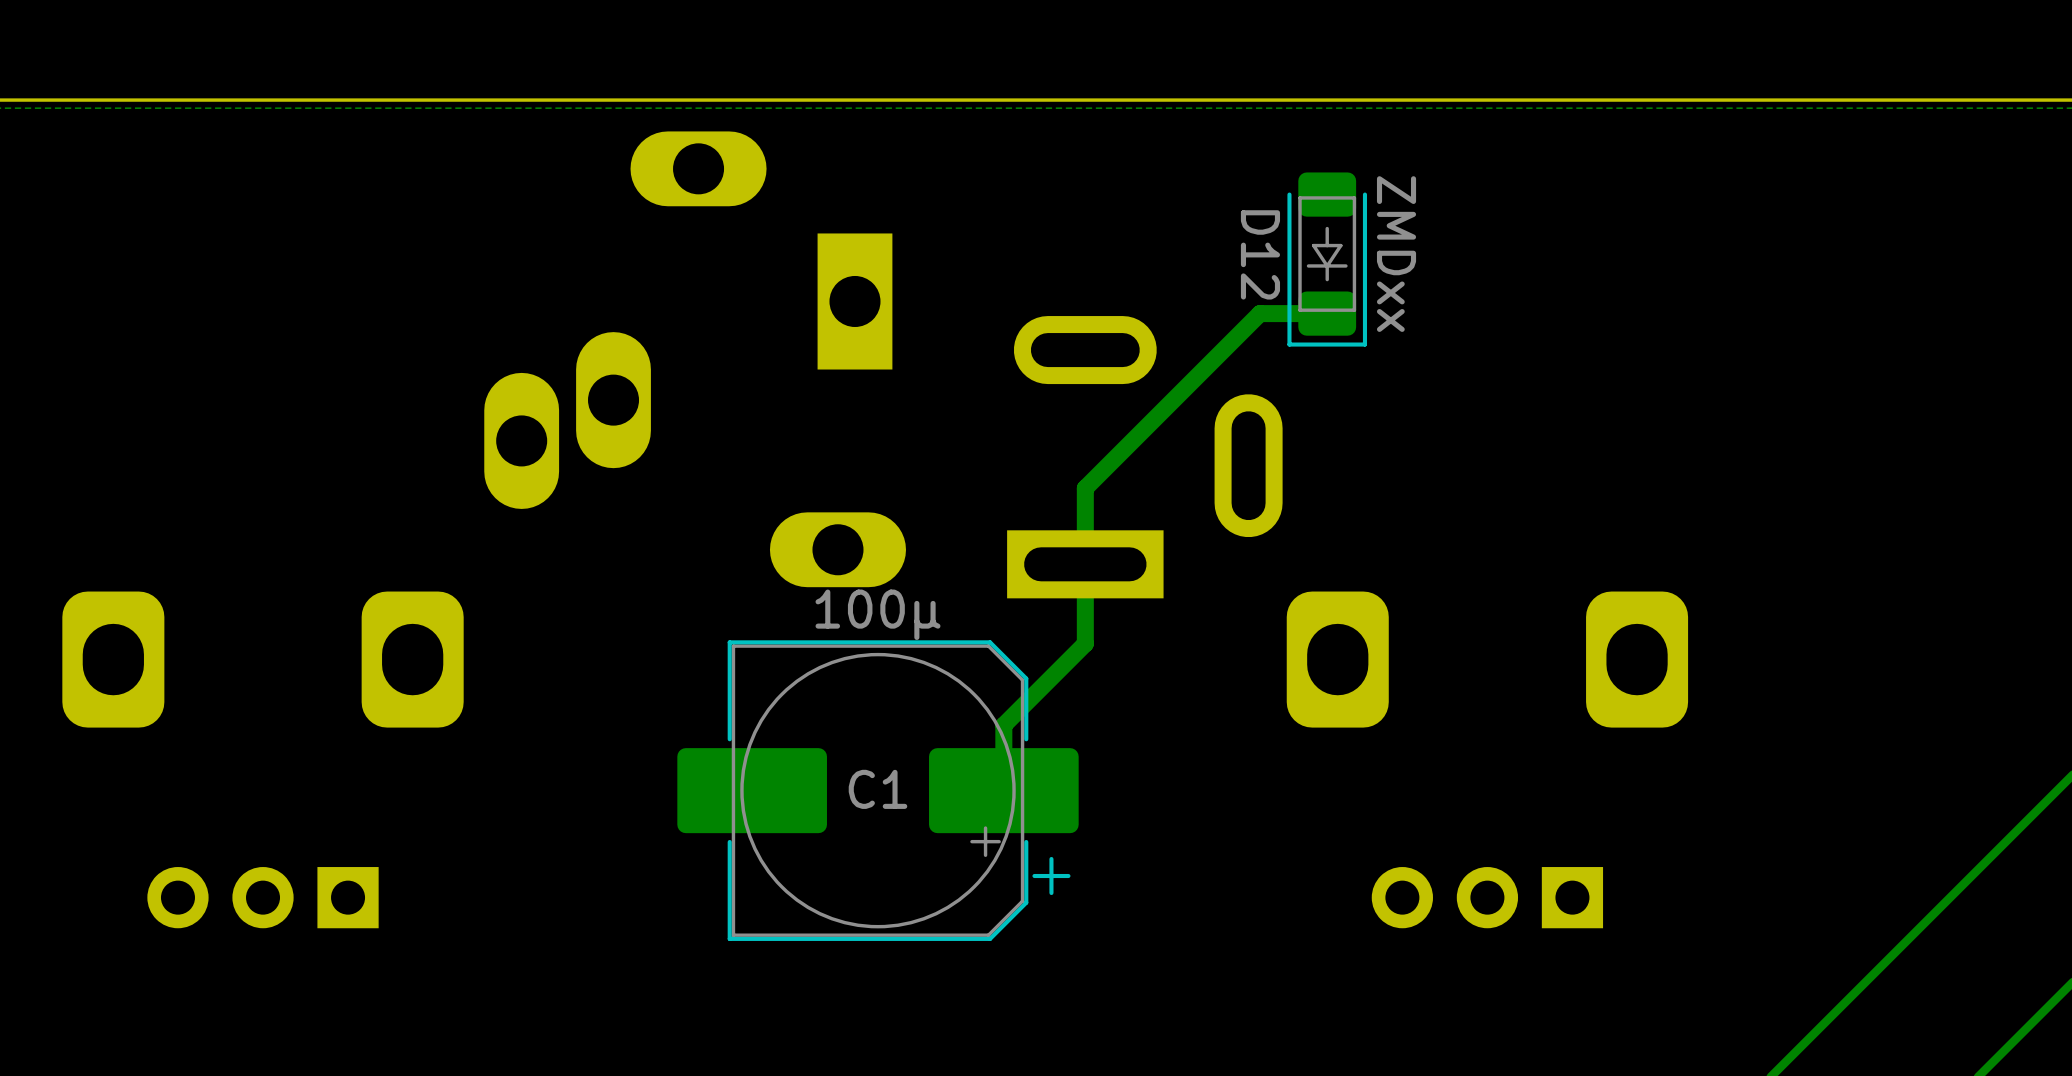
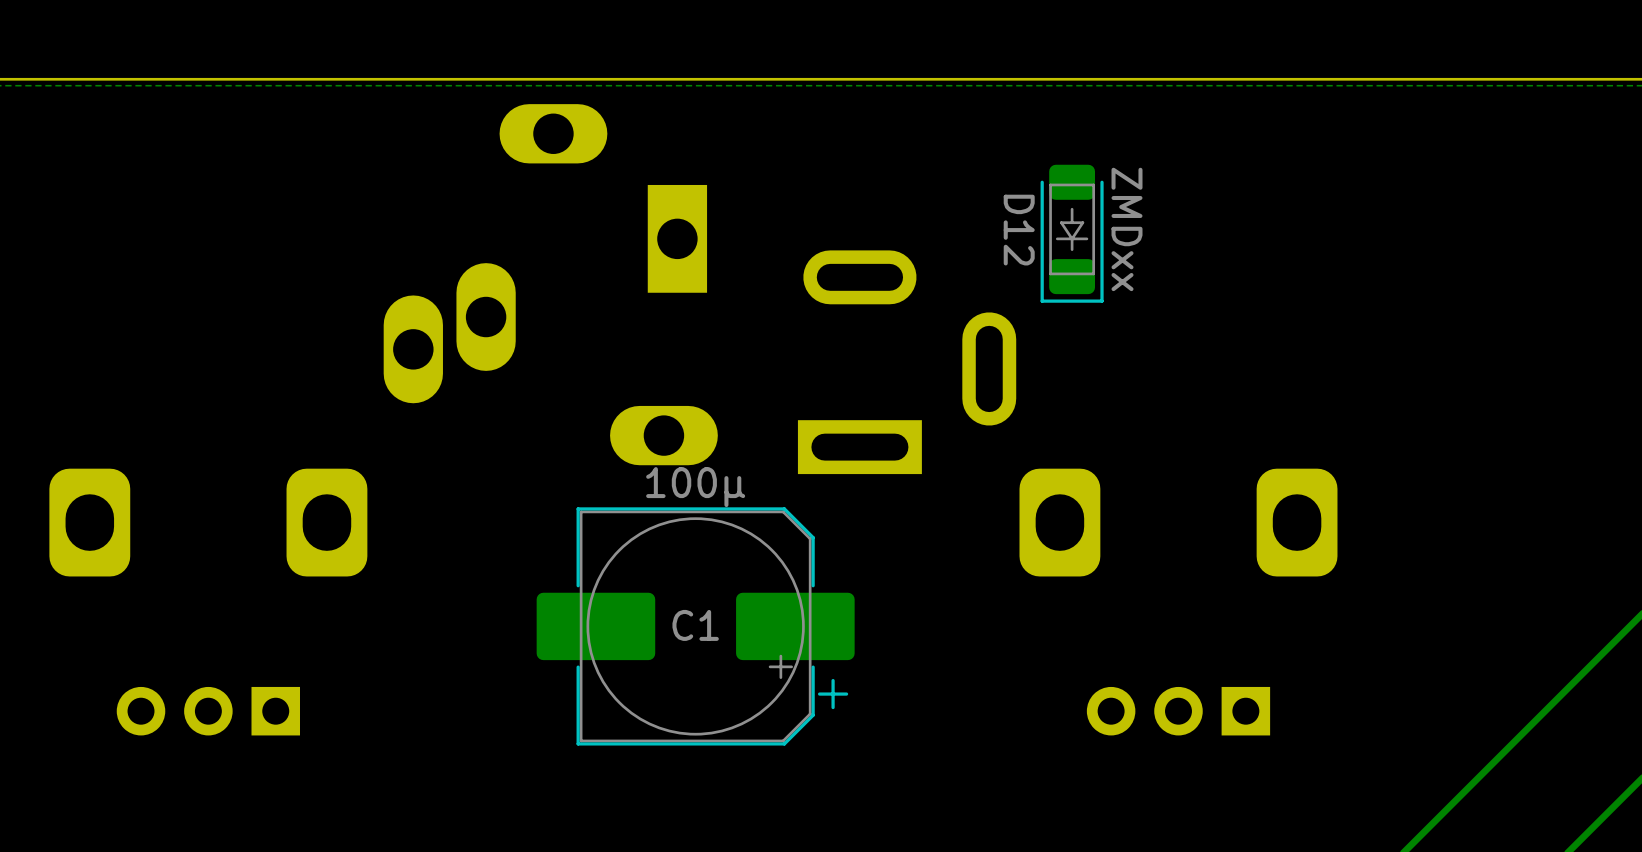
D12 position: (1327, 259) -> (1072, 233)
track: (1327, 313) (1260, 313) (1085, 488) (1085, 643) (1003, 725) (1003, 790) -> none

